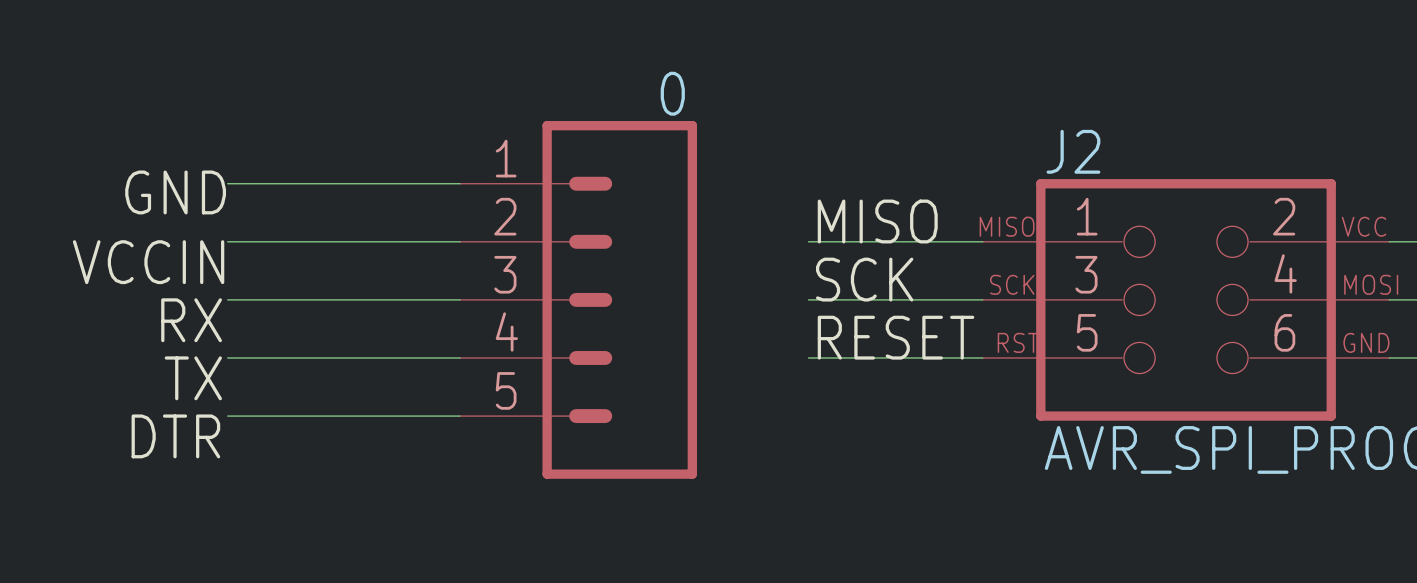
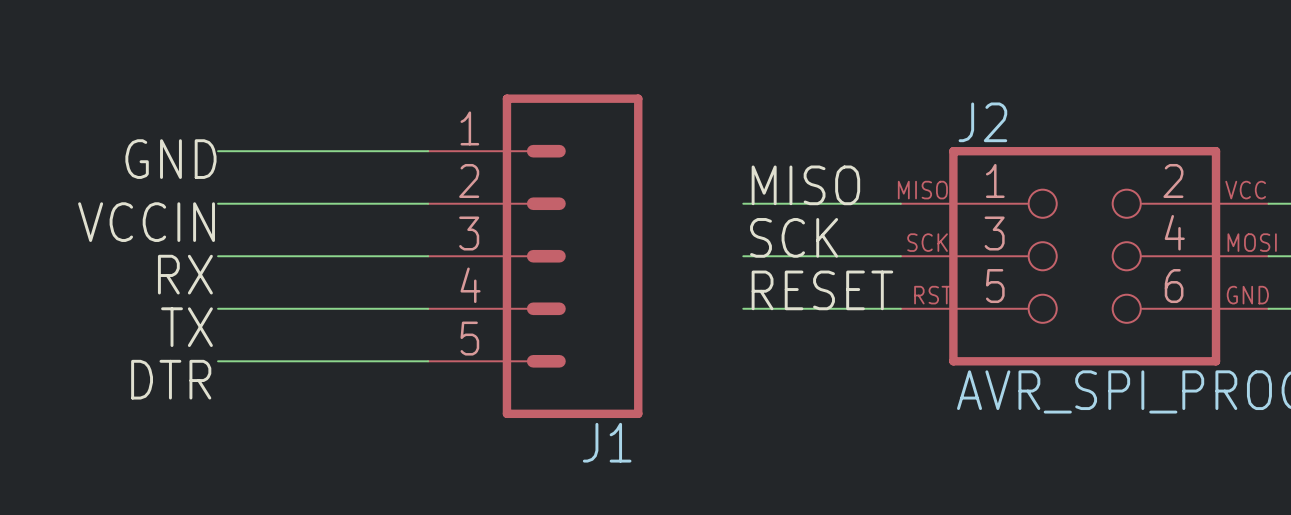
J1 value: 0 (672, 93) -> none
J1 name: none -> J1 (607, 442)

